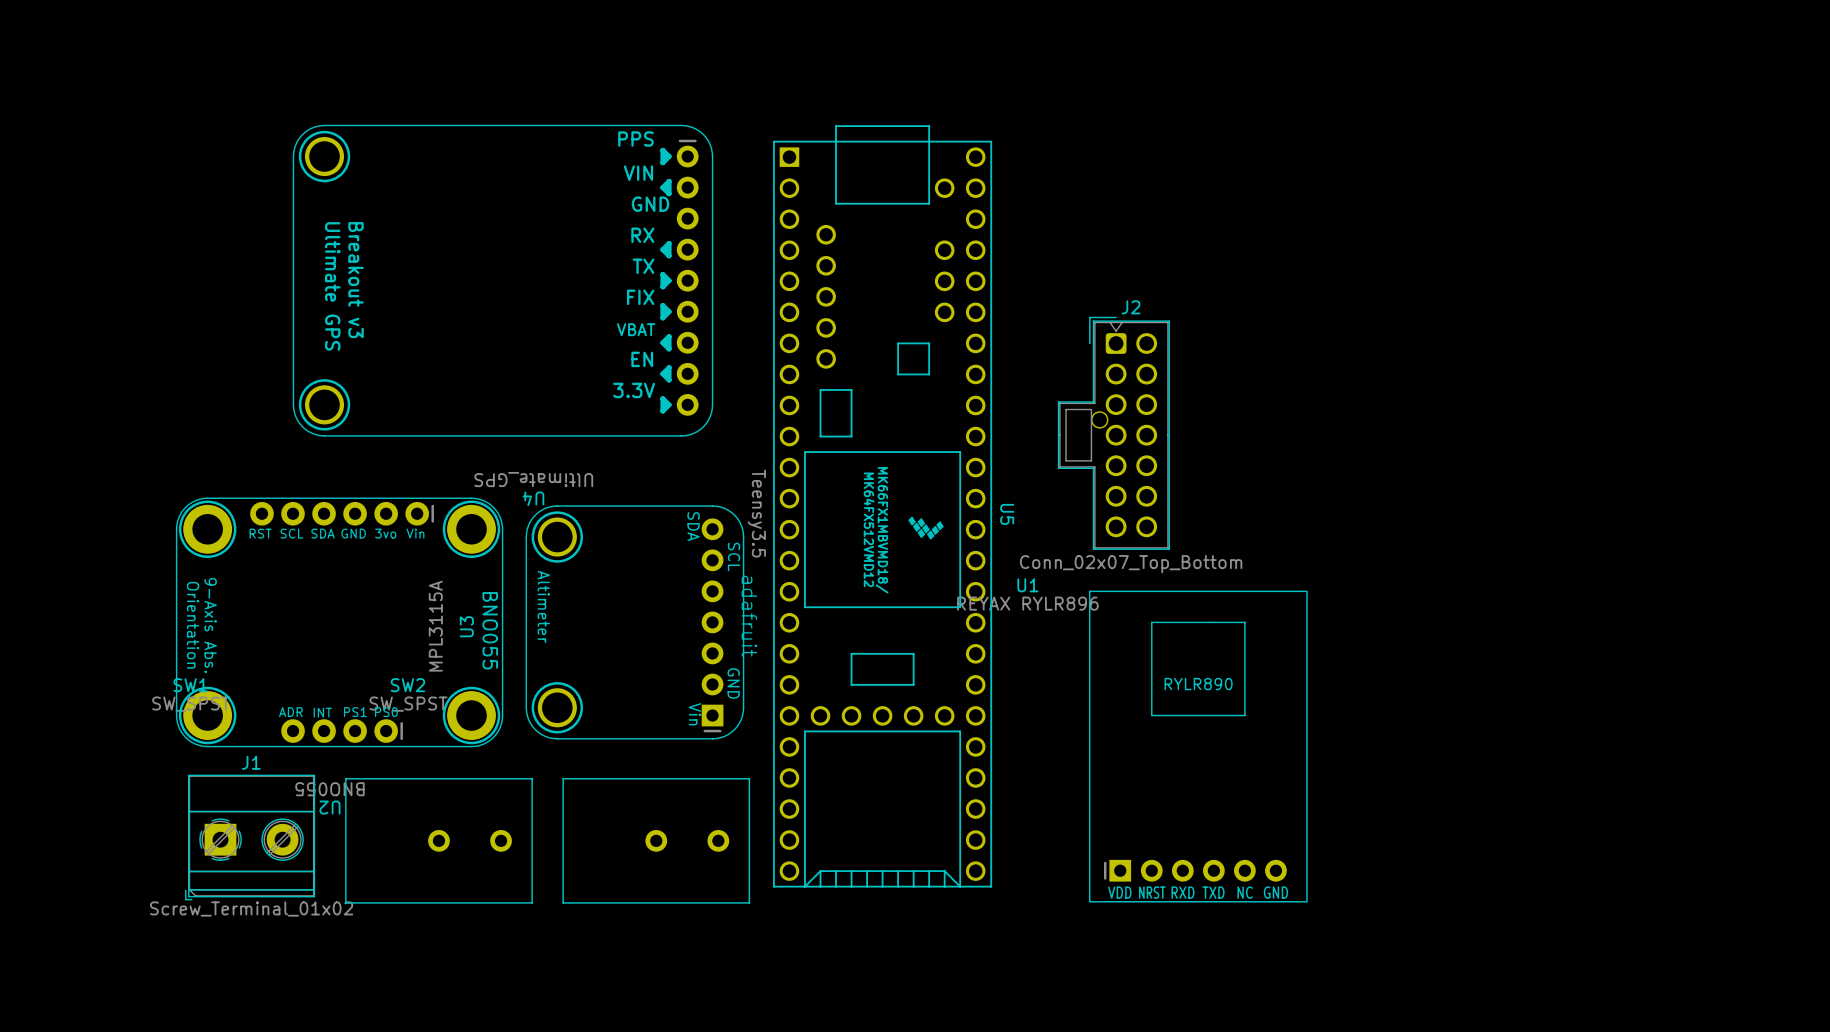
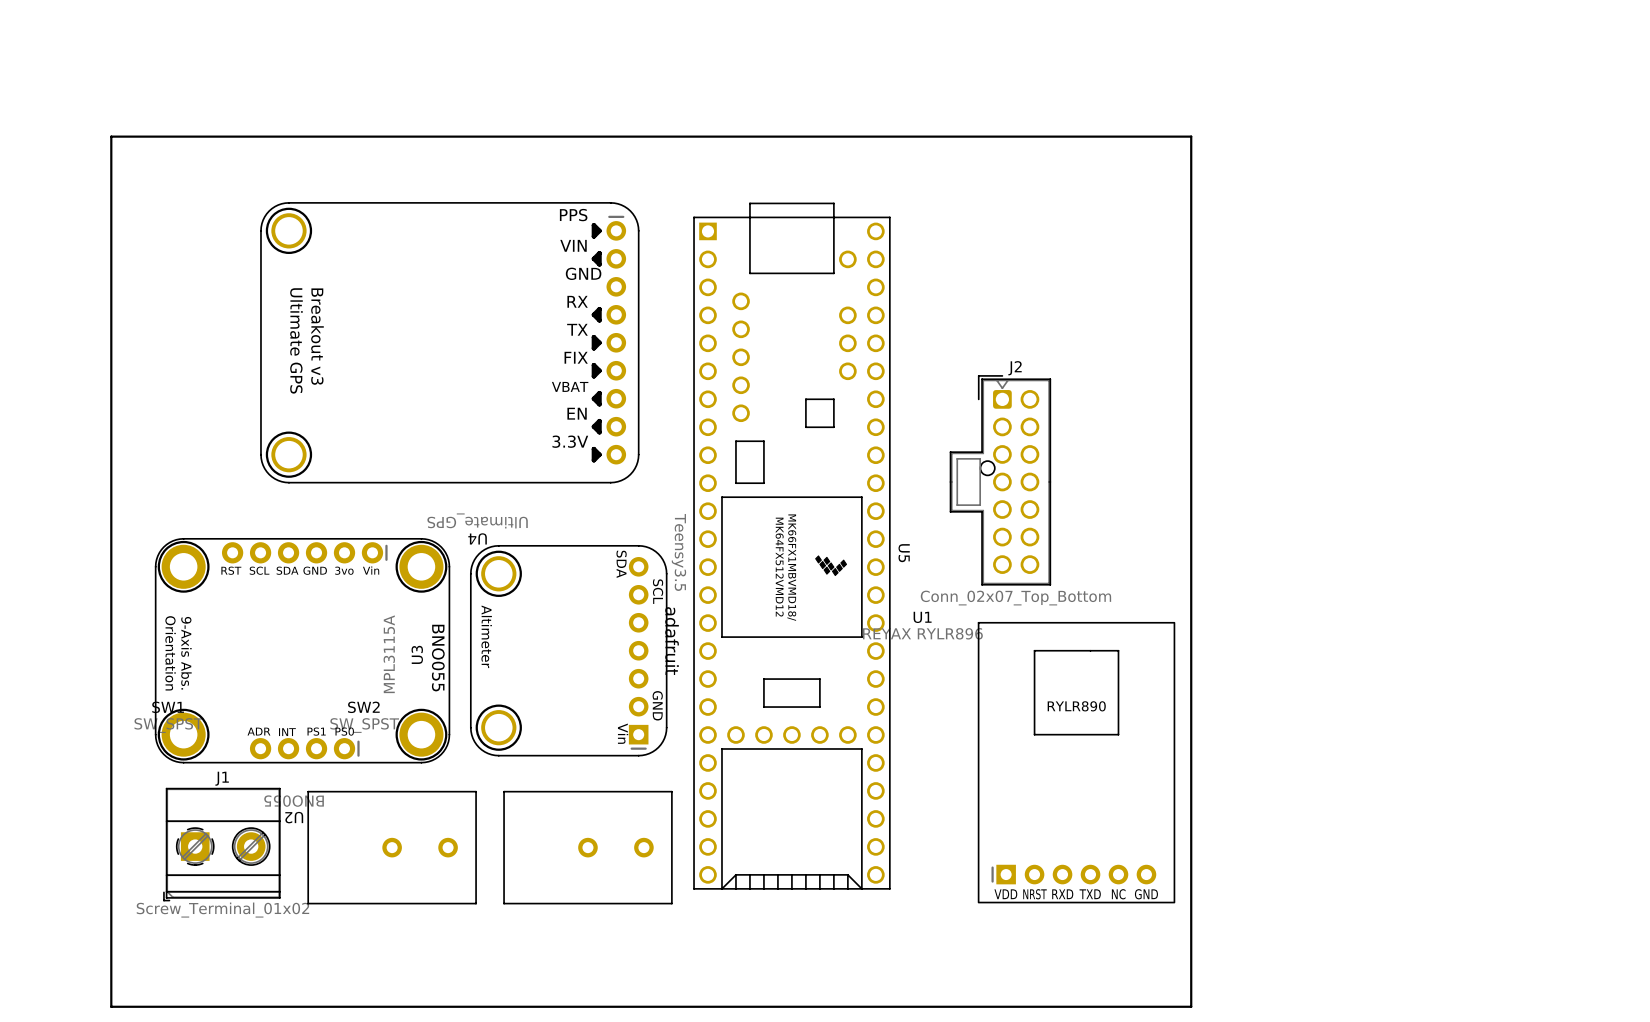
board edge: none -> (1191, 136) (111, 136) (111, 1006) (1191, 1006) (1191, 136)

